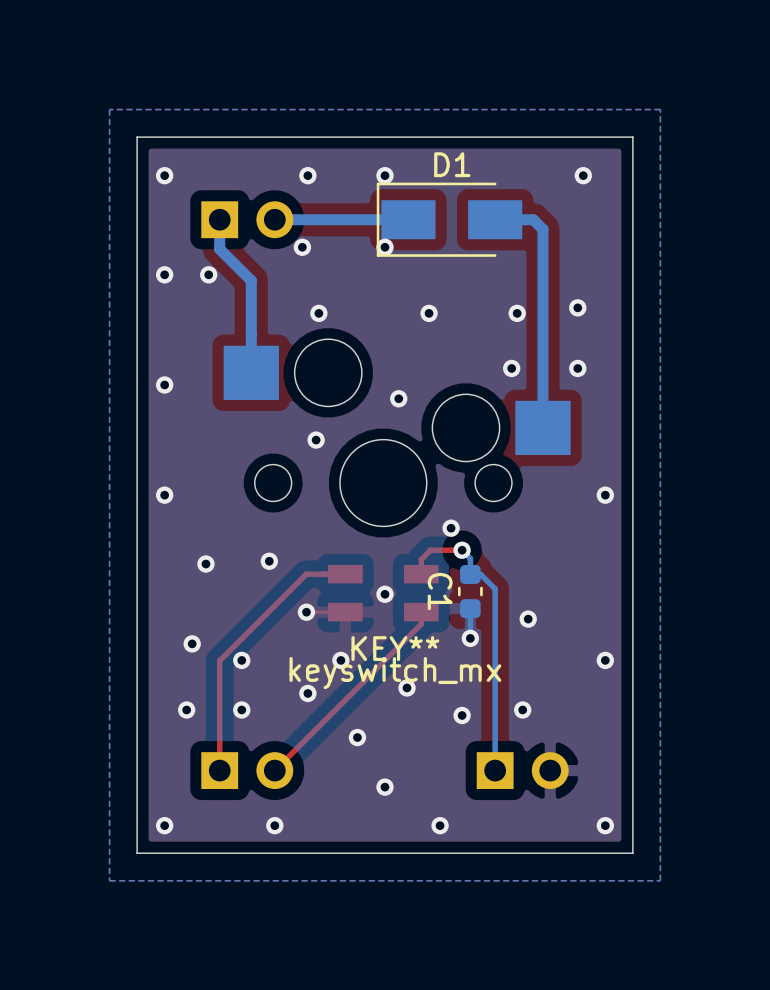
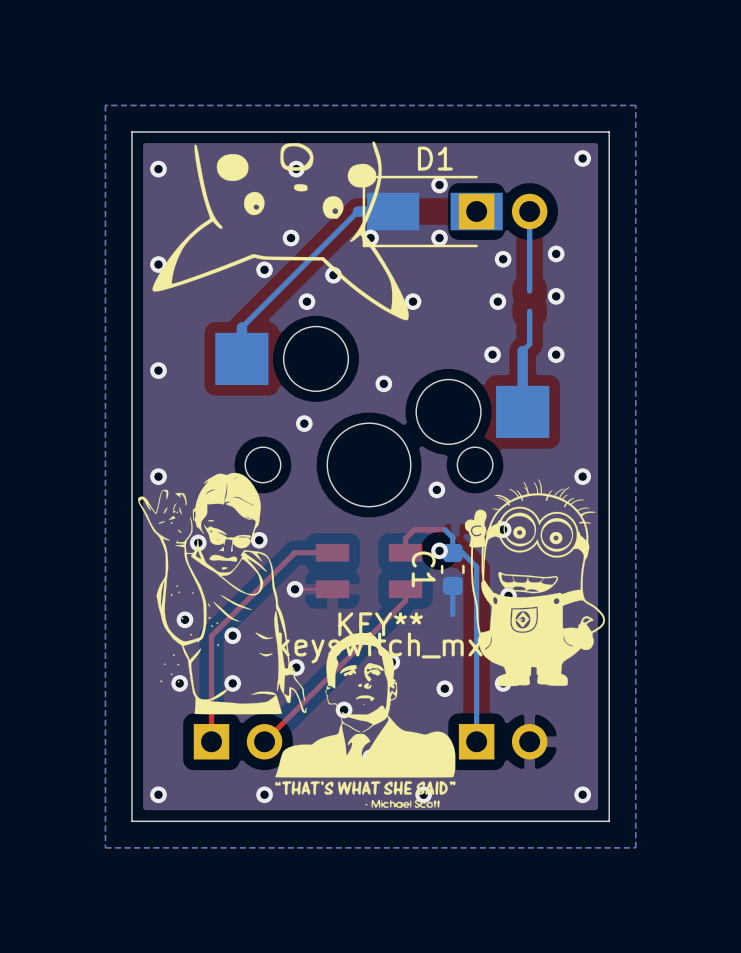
drawing: none -> [152, 141, 409, 321]
via: (384, 175) -> none
via position: (583, 175) -> (582, 158)
via: none -> (439, 185)
bottom track: (219, 219) (219, 249) (251, 280) (251, 340) -> none
part position: (247, 219) -> (503, 211)
bottom track: (371, 219) (274, 219) -> (357, 211) (241, 327)
bottom track: (495, 219) (533, 219) (542, 229) (542, 364) -> (529, 311) (529, 344) (522, 351)
bottom track: none -> (529, 211) (529, 291)
via: none -> (439, 238)
via: none -> (556, 253)
via: none -> (503, 259)
via position: (208, 274) -> (264, 269)
via: none -> (333, 275)
drawing: none -> [138, 472, 606, 808]
via position: (451, 528) -> (436, 489)
via: (462, 550) -> none
via: none -> (503, 529)
via: none -> (439, 550)
via: (384, 594) -> none
via: (470, 638) -> none
via: (340, 660) -> none

